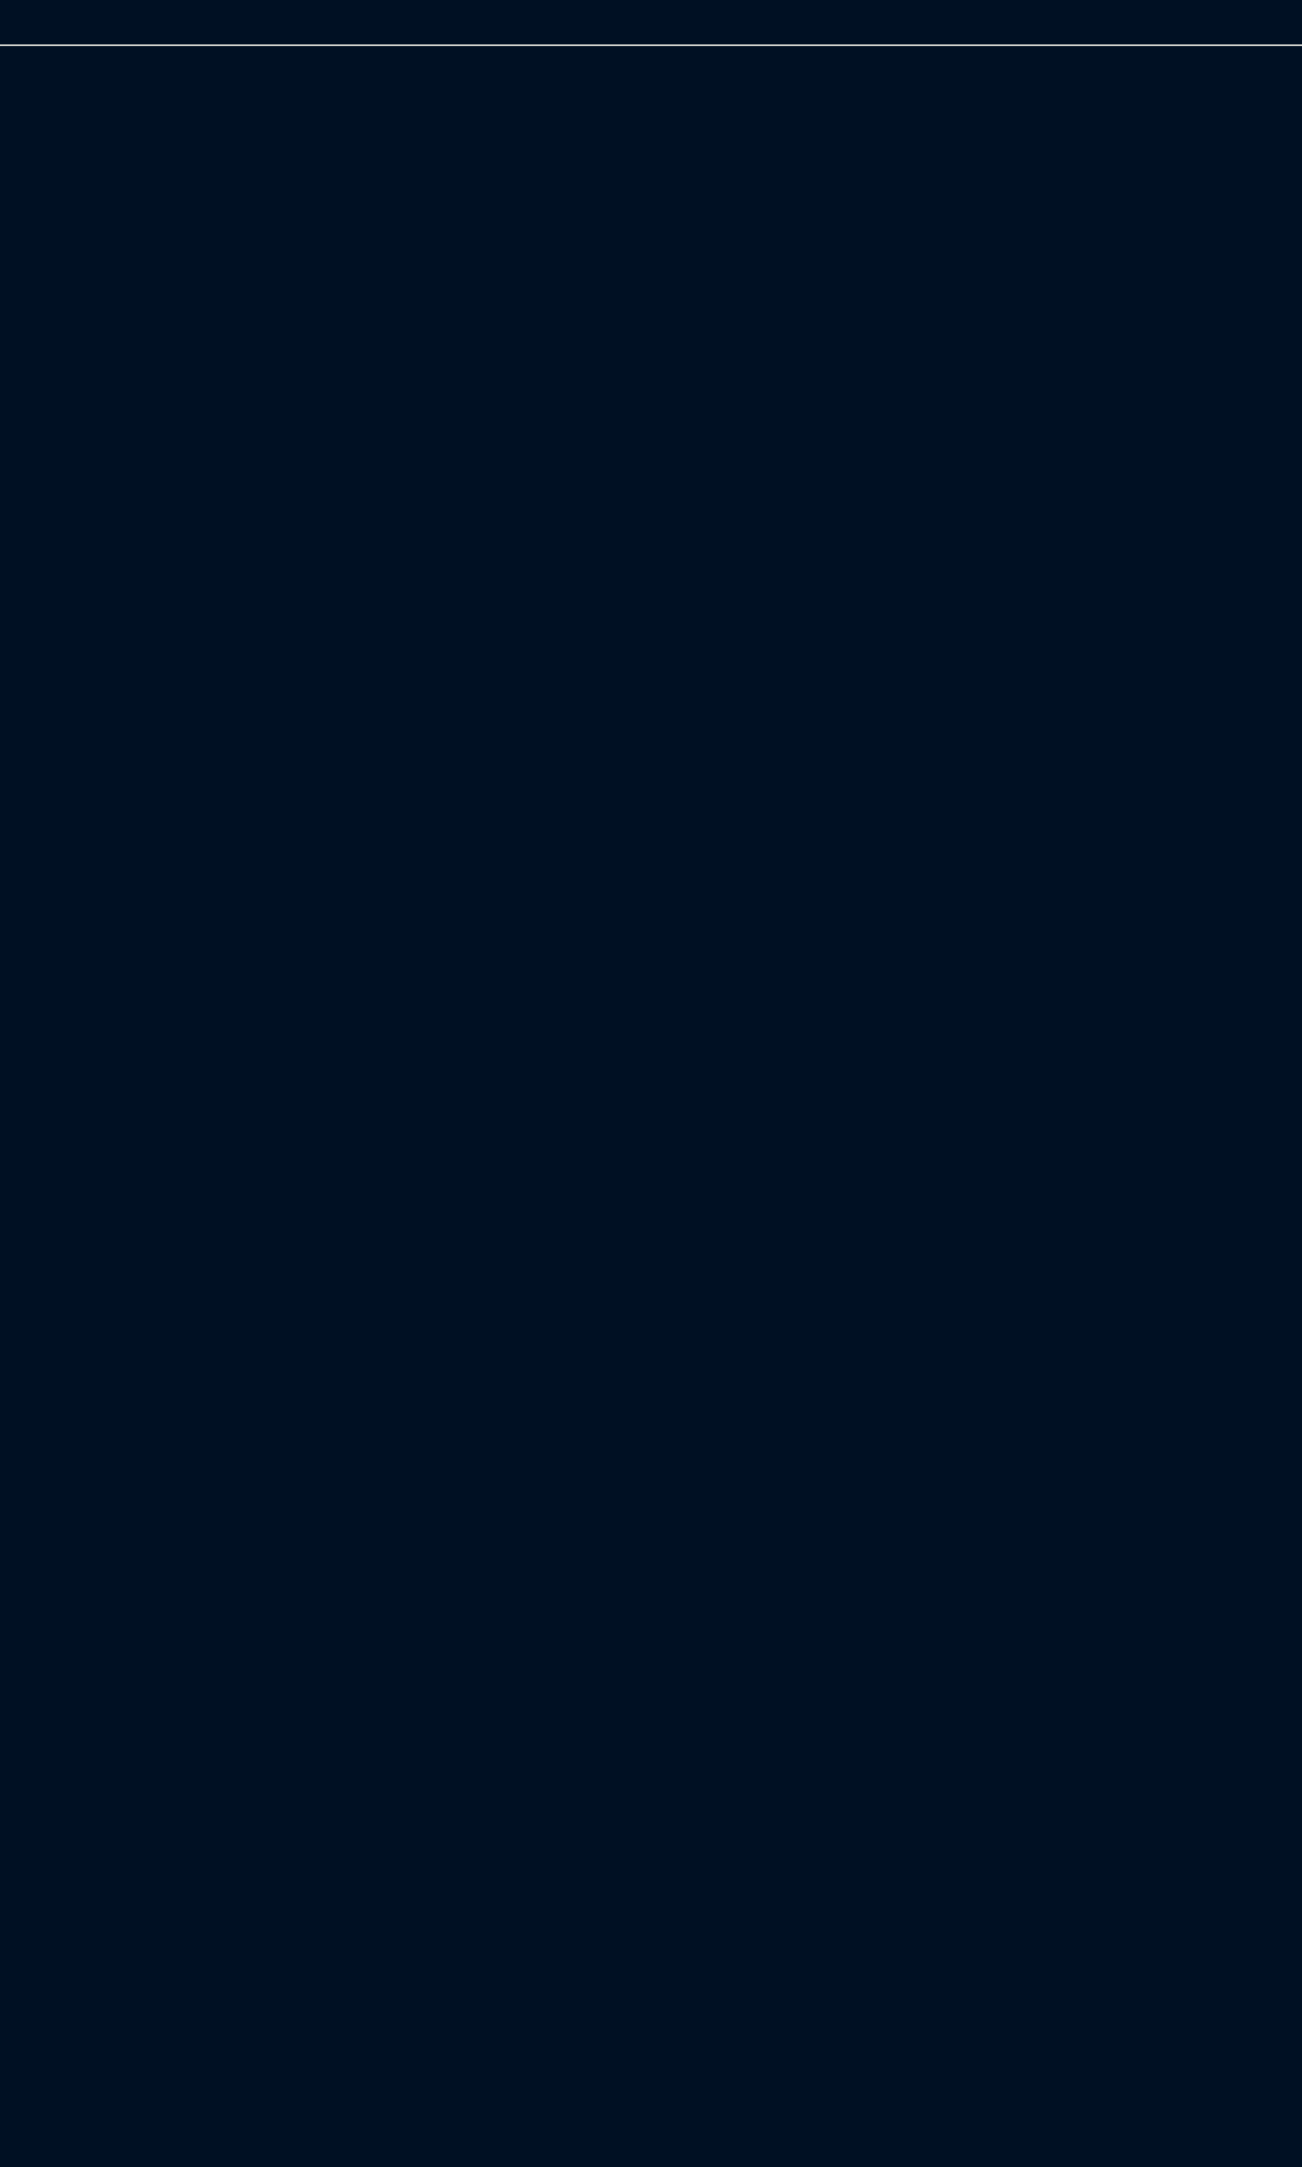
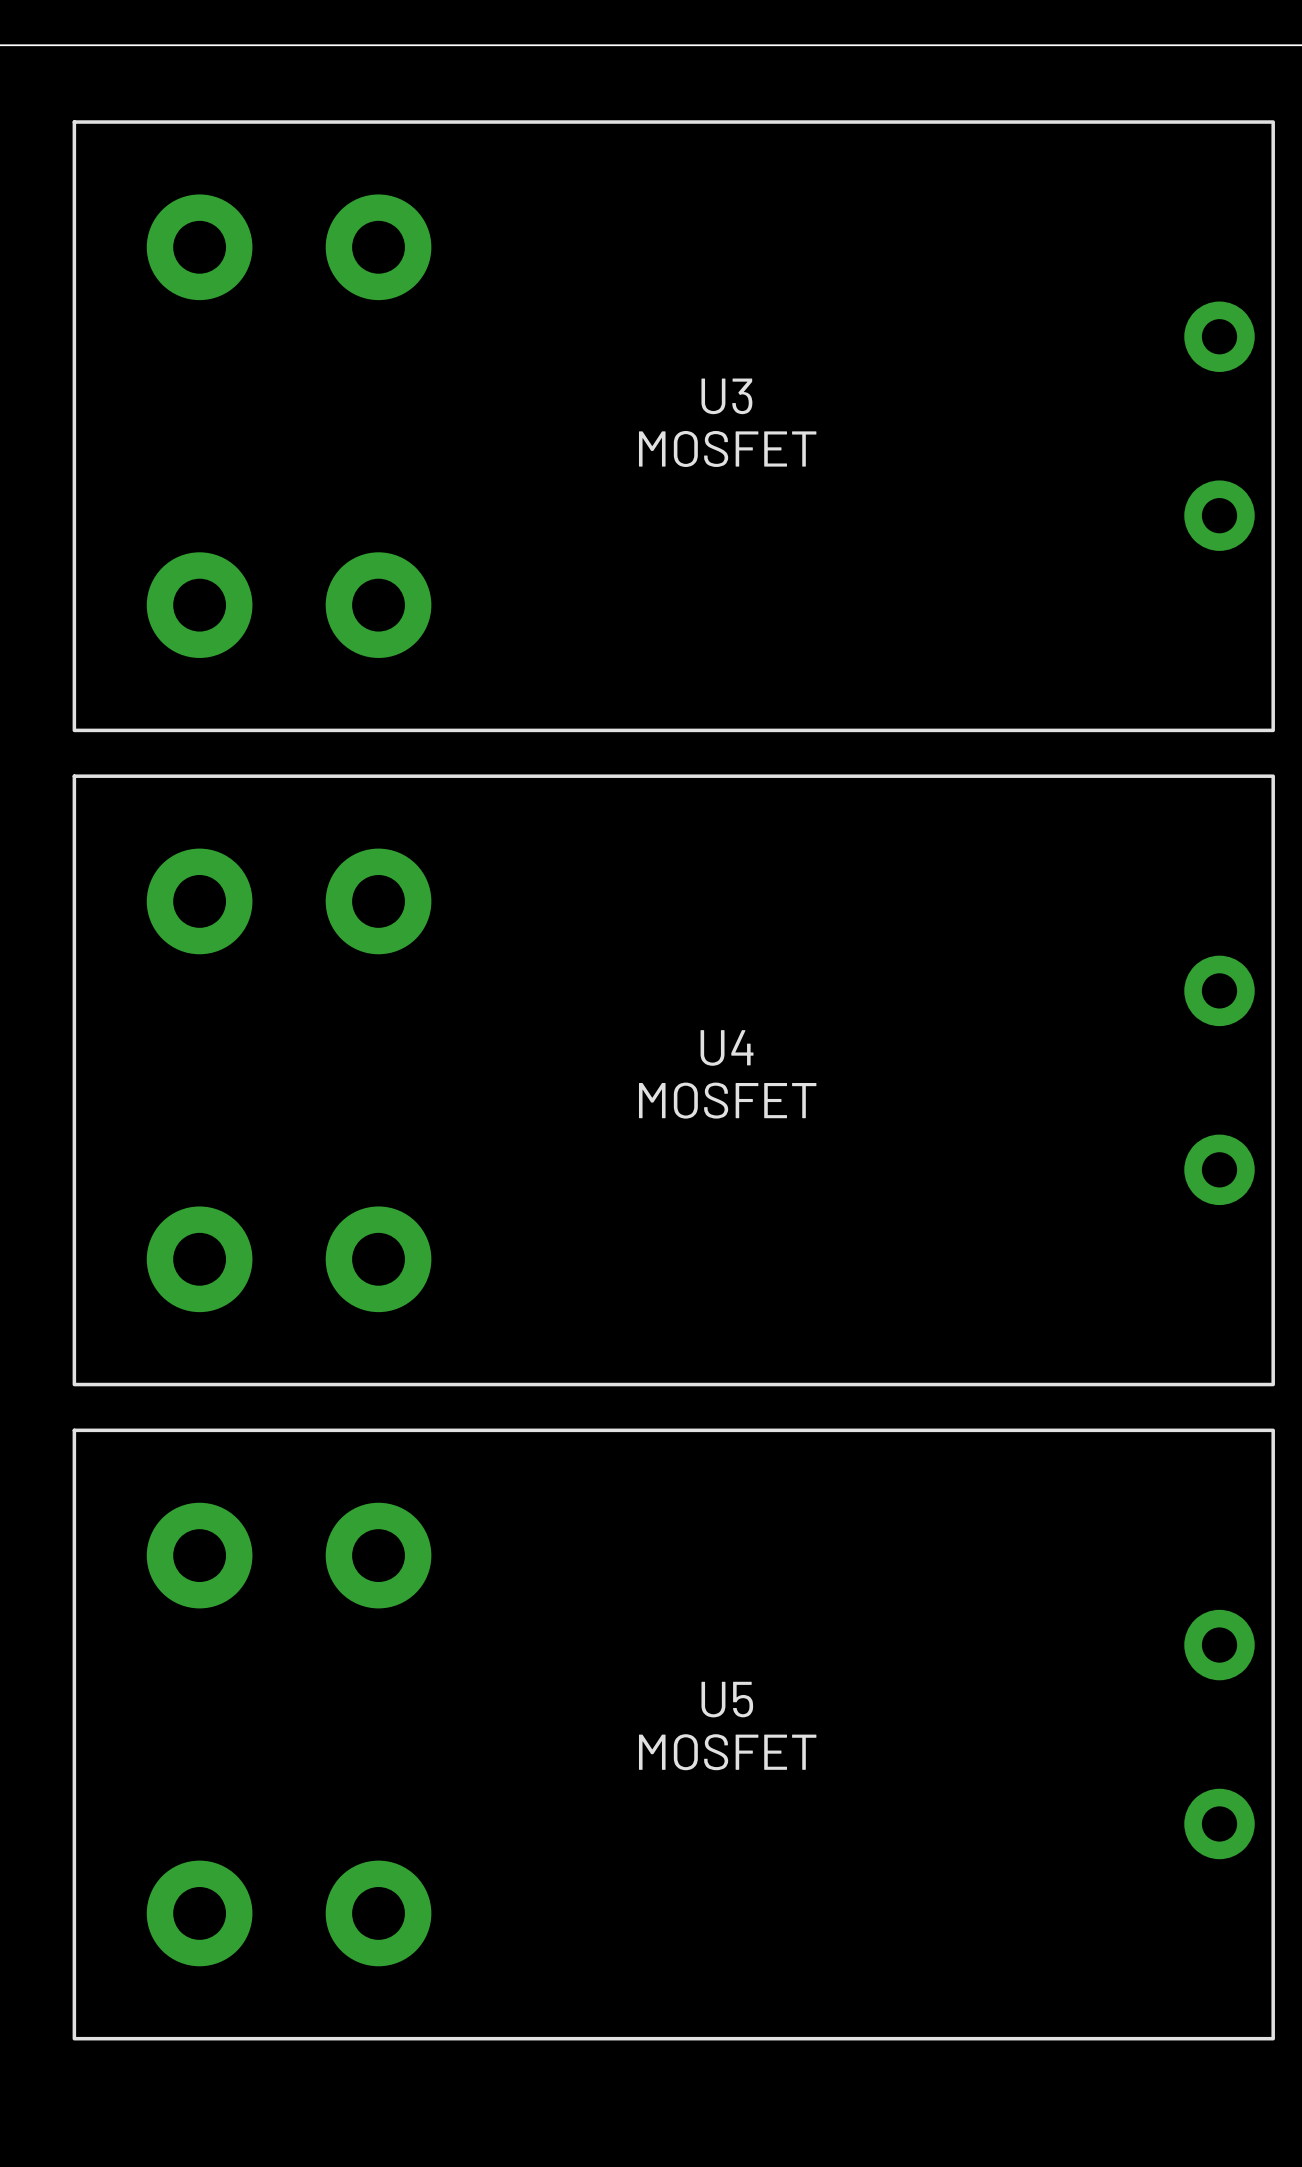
U3: none -> MOSFET (673, 426)
U4: none -> MOSFET (673, 1080)
U5: none -> MOSFET (673, 1734)

